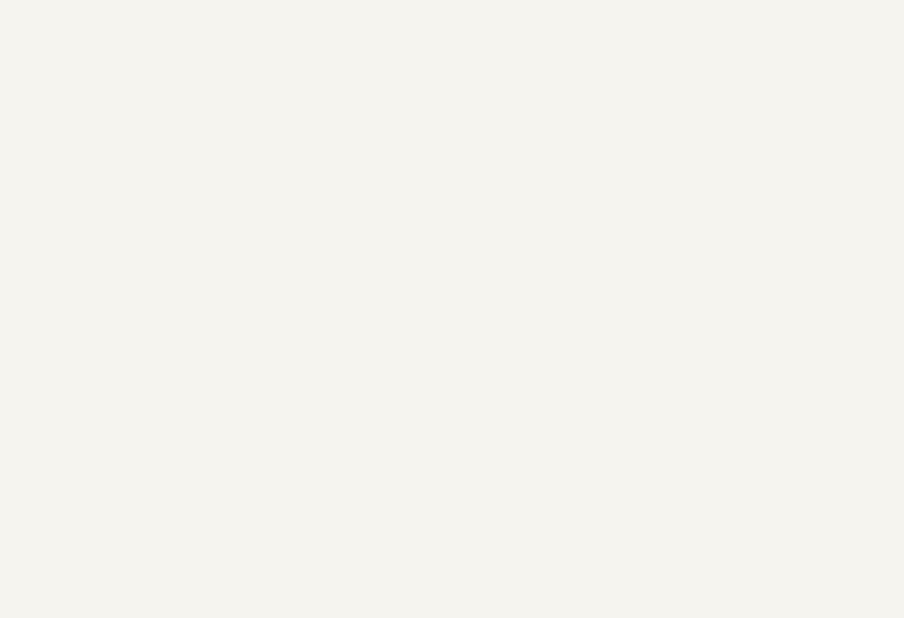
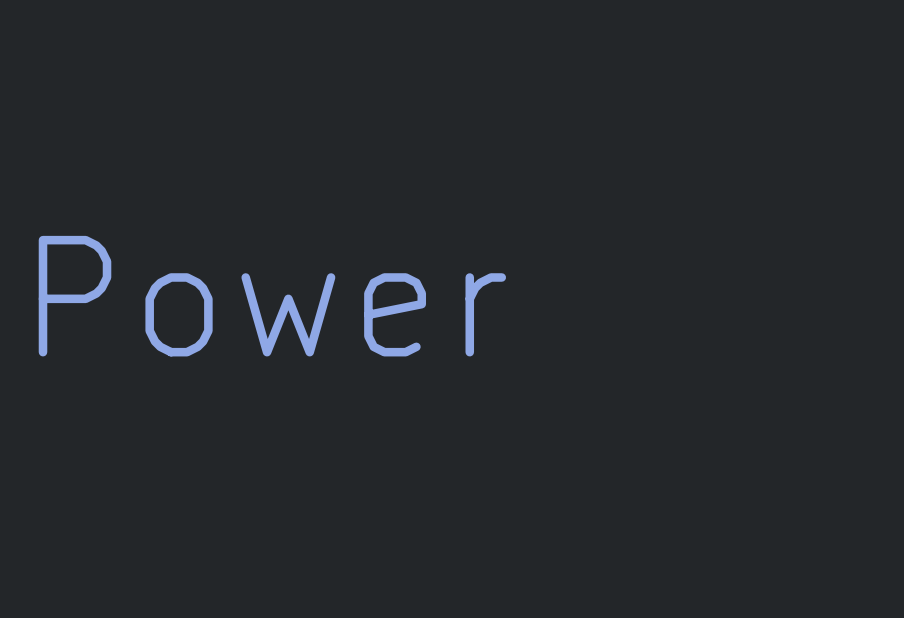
text: none -> Power (272, 296)

